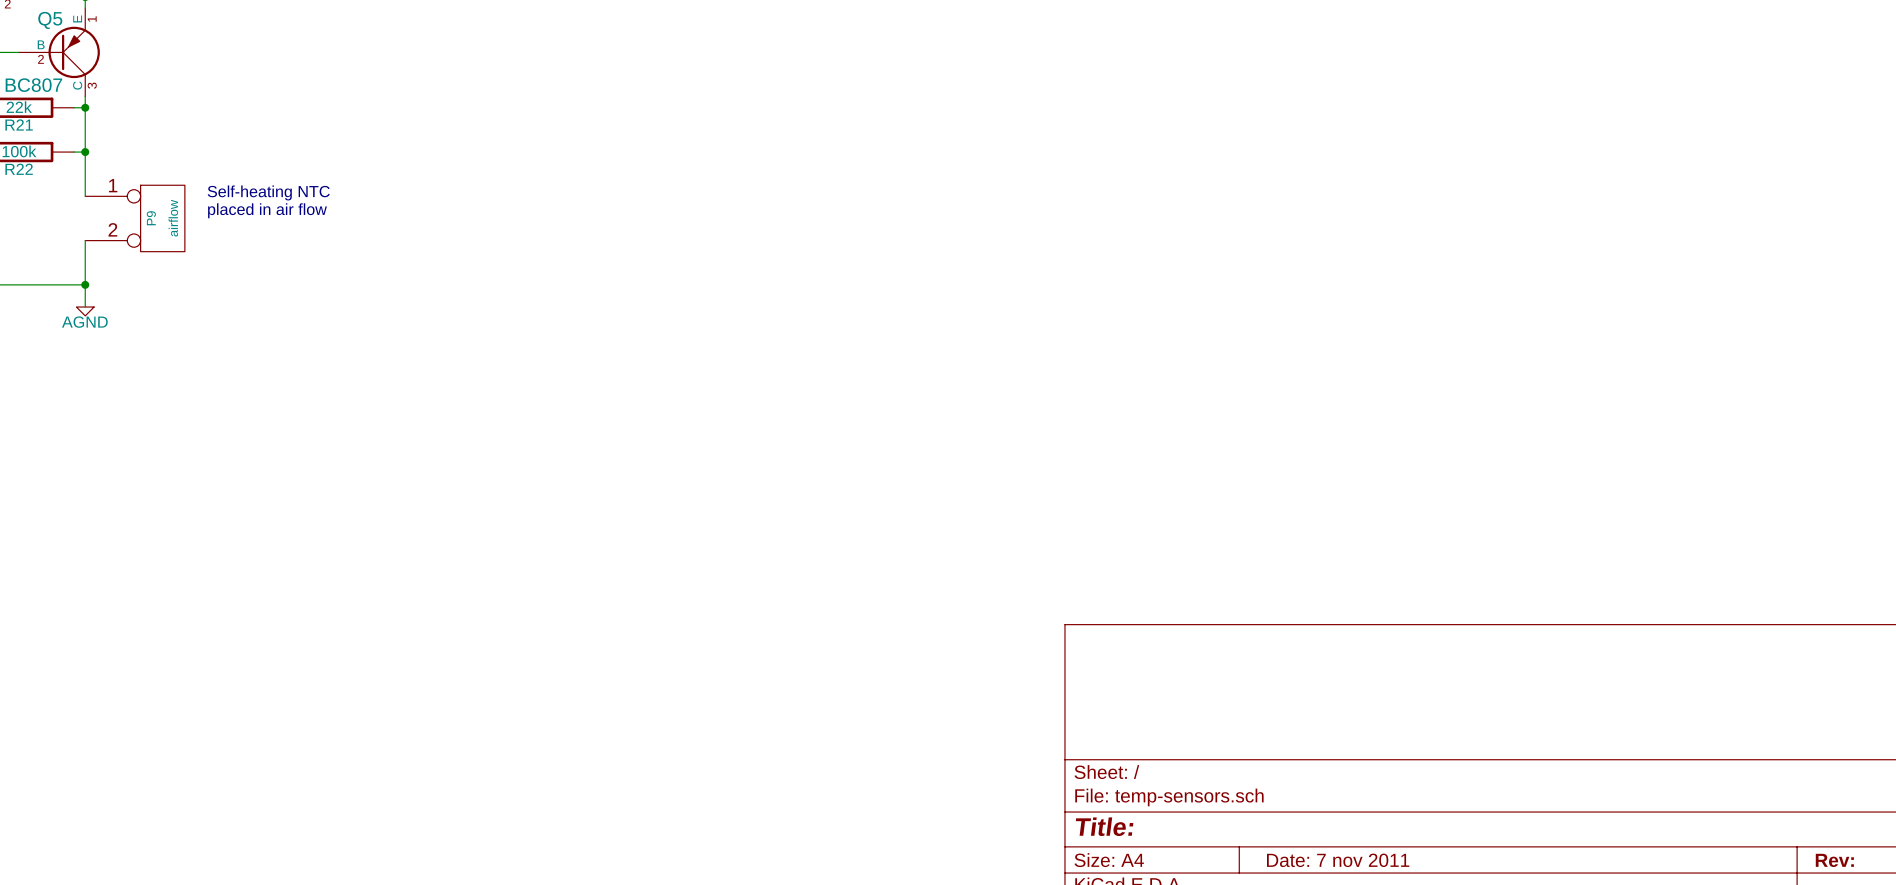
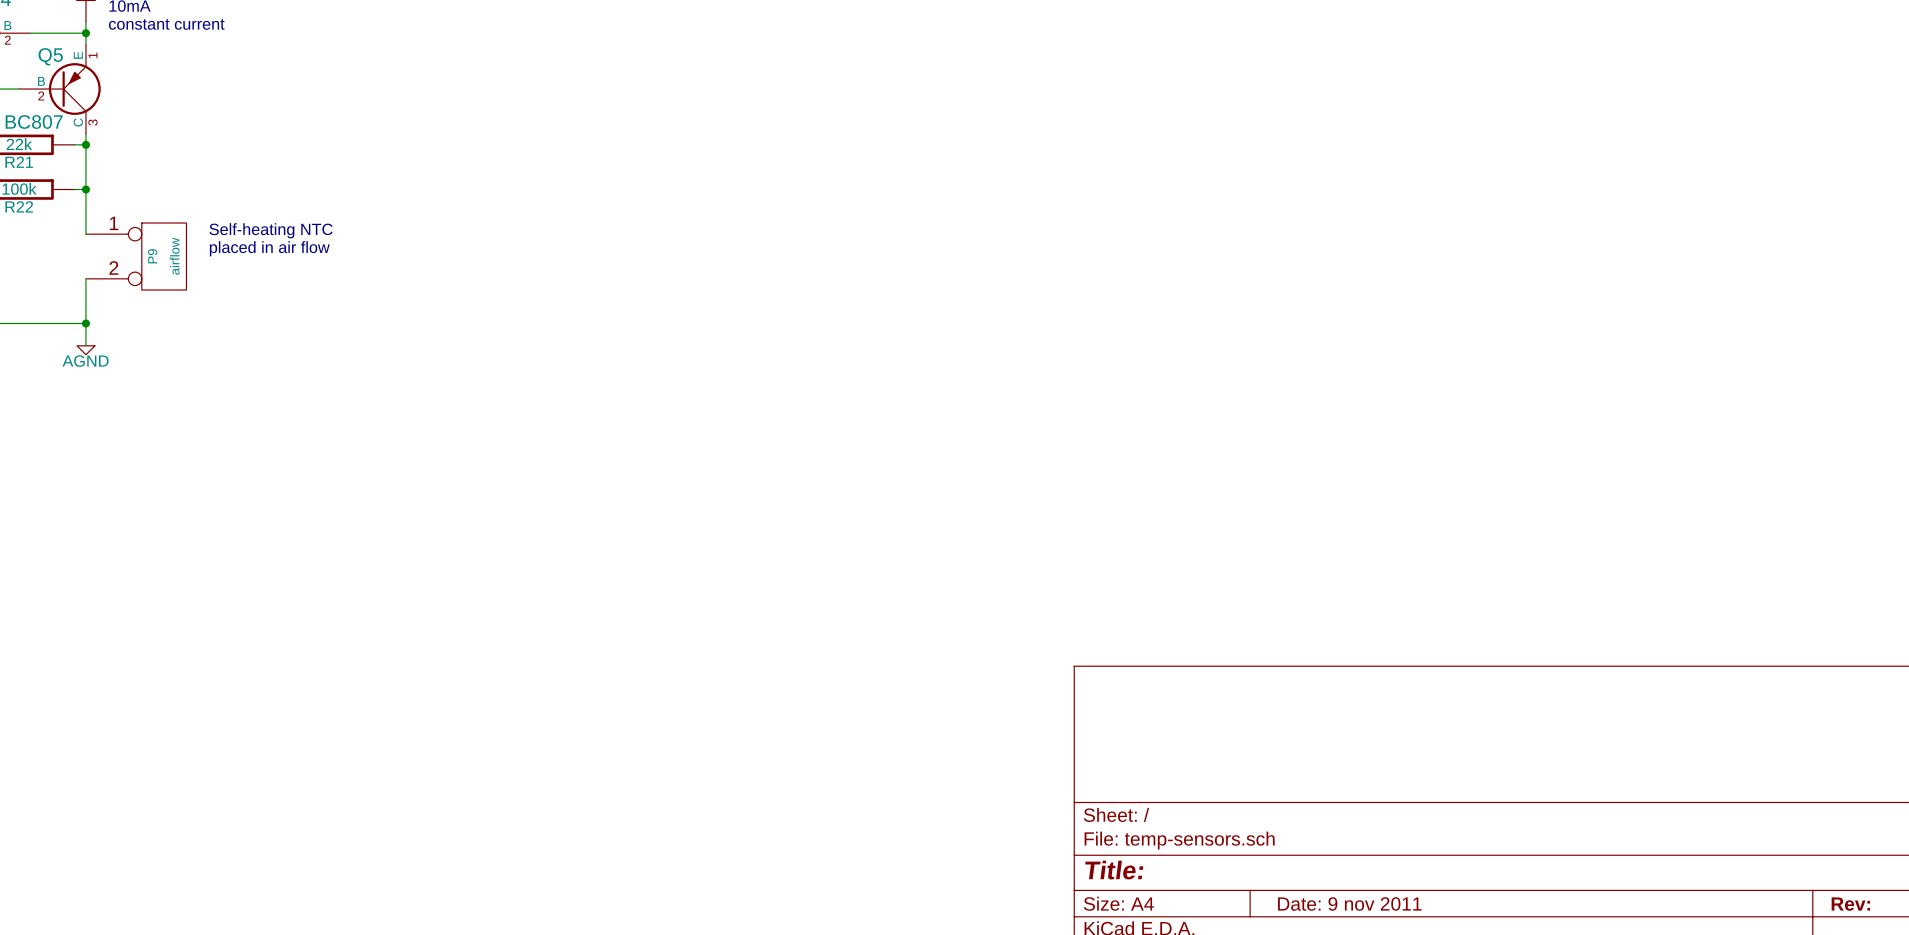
title block: Date: 7 nov 2011 (1338, 860) -> Date: 9 nov 2011 (1349, 903)

